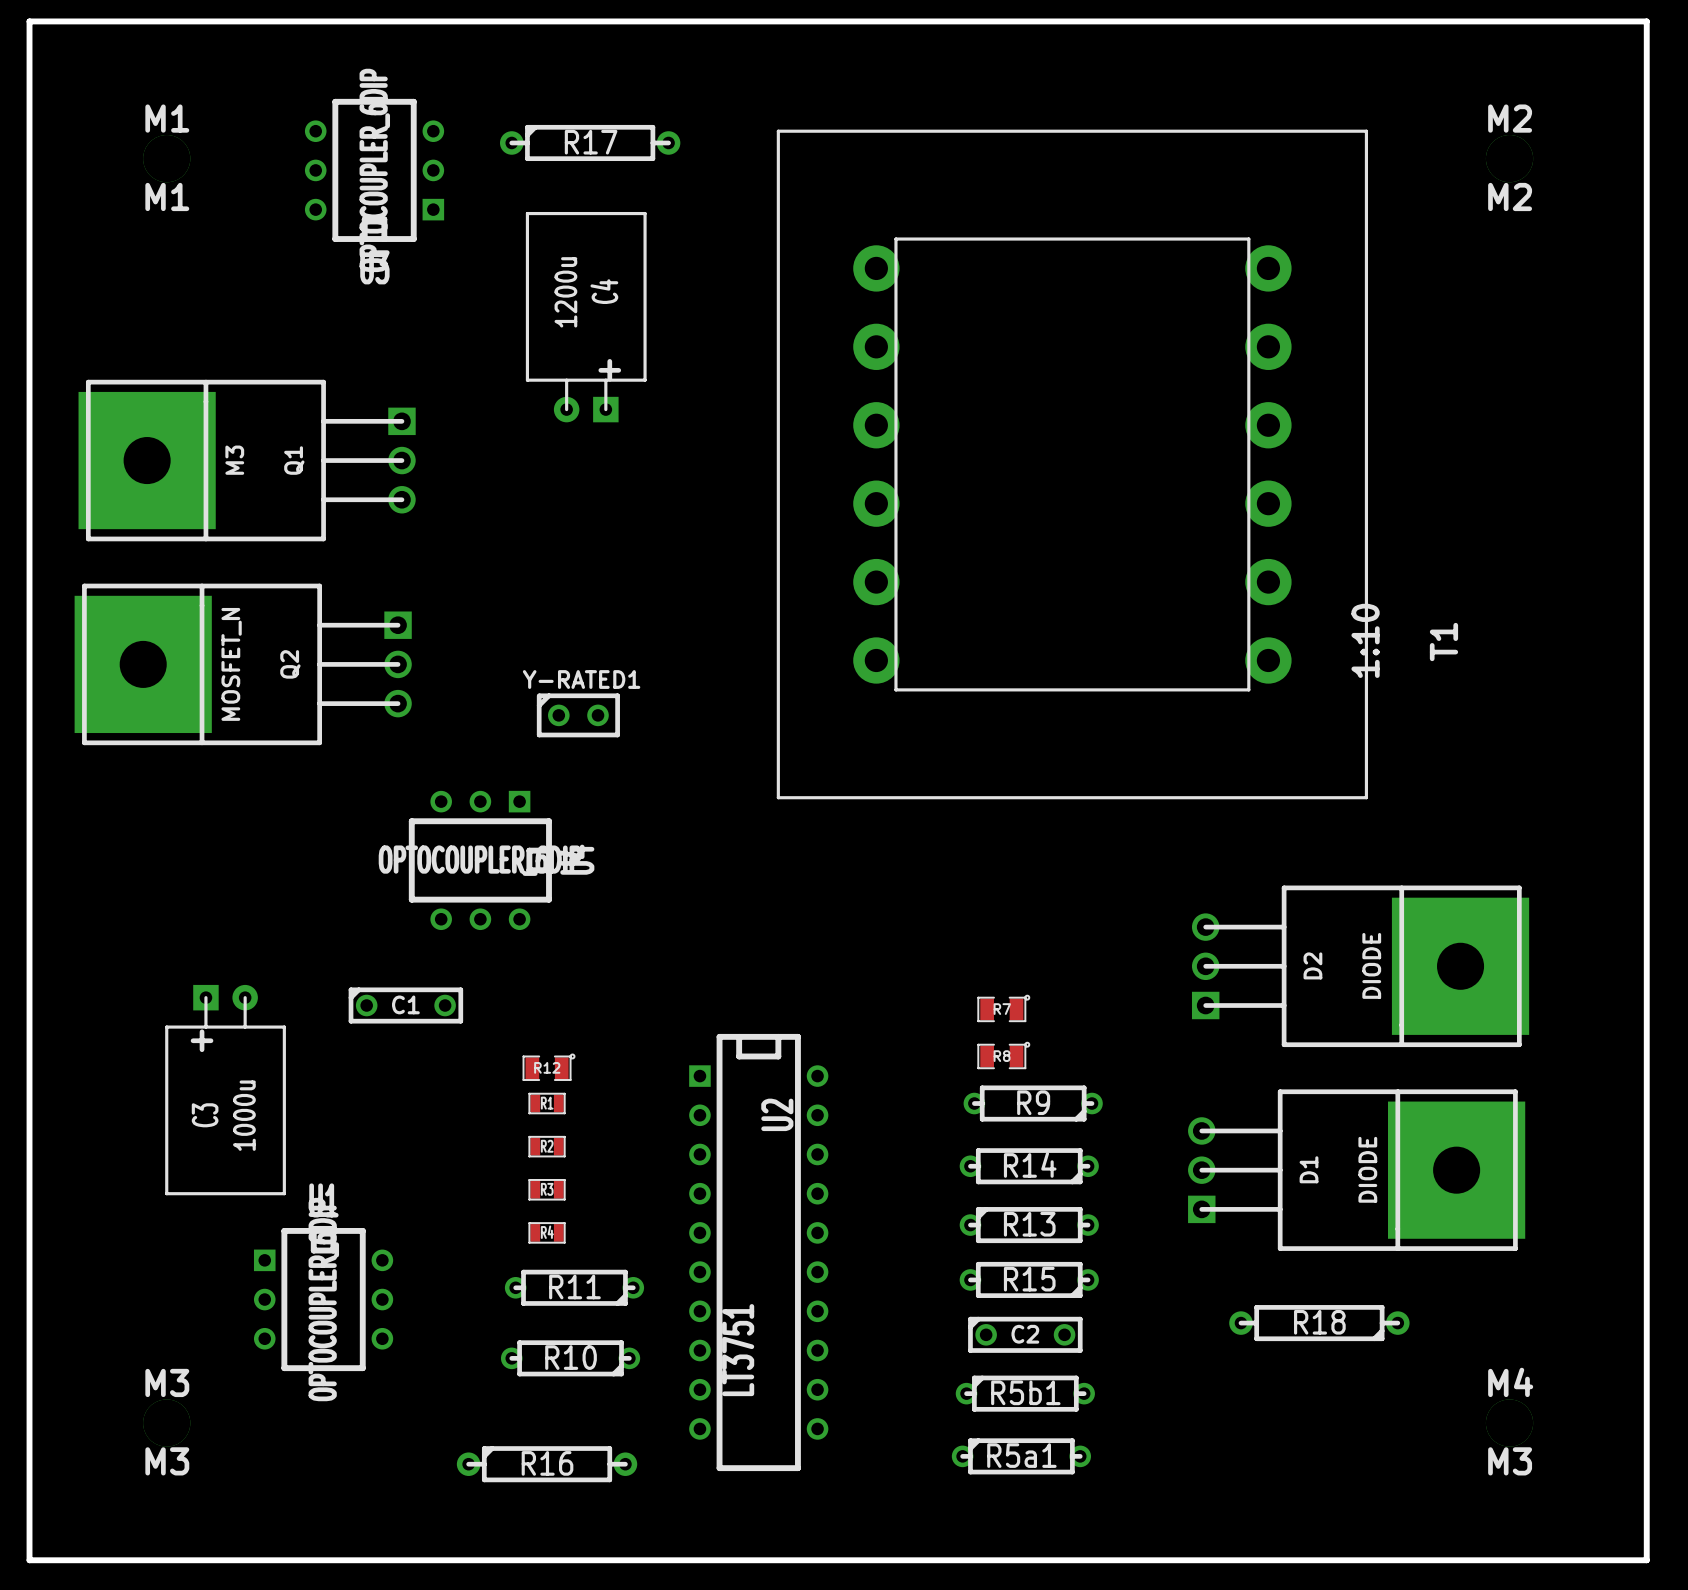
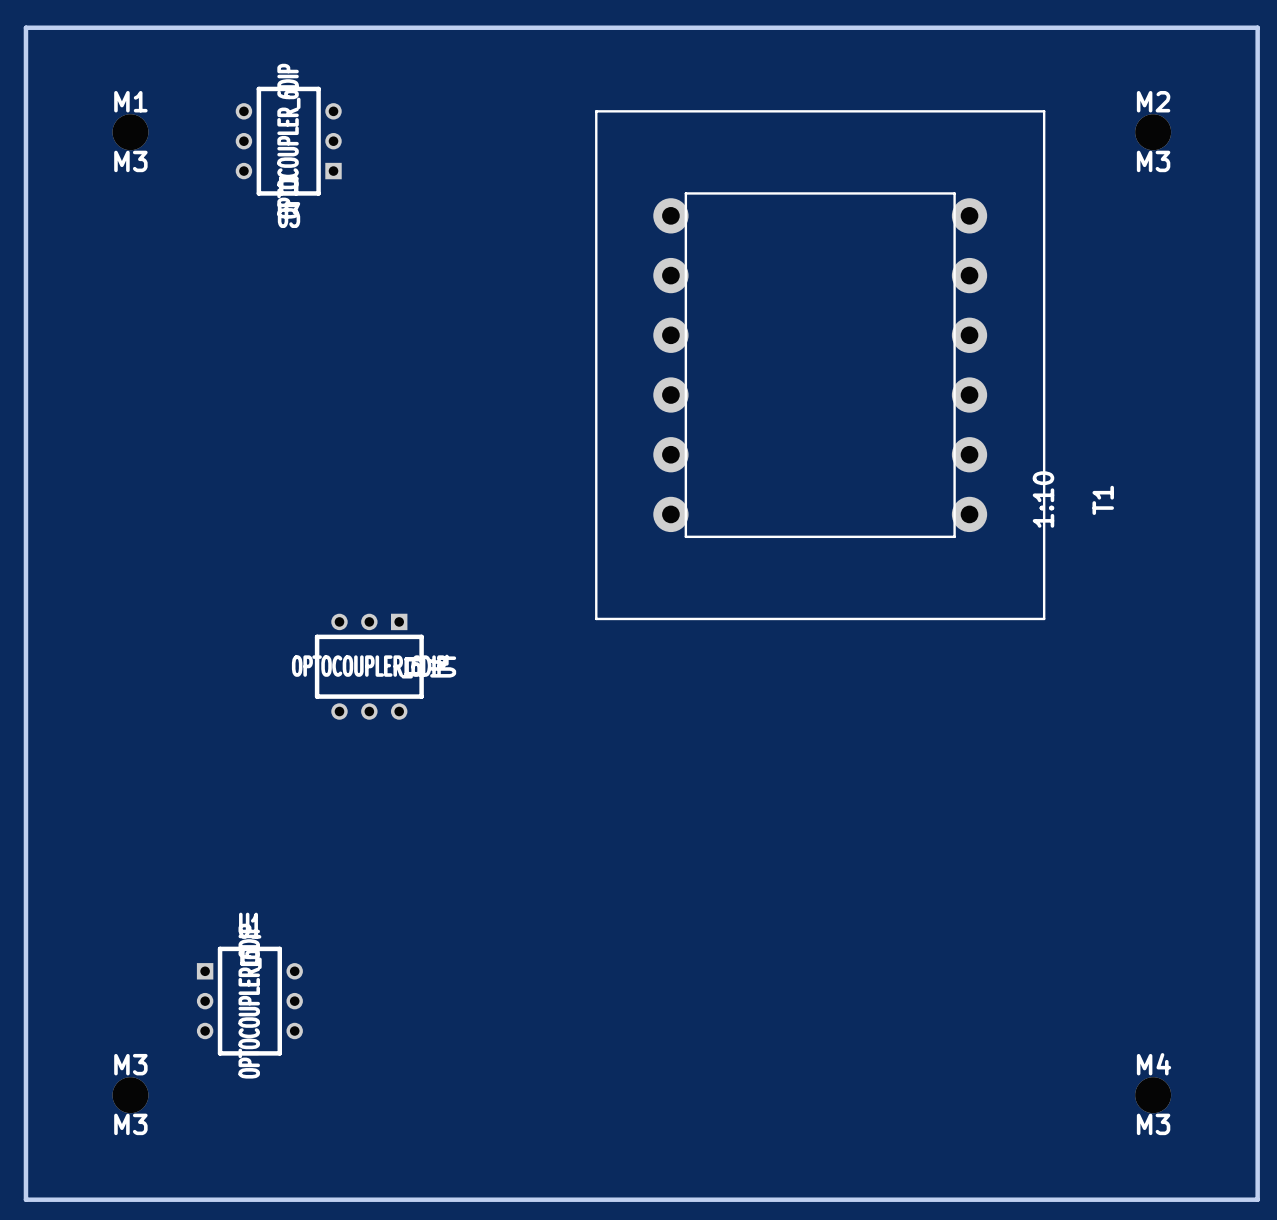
R17: (590, 142) -> none
M1 value: M1 (167, 196) -> M3 (130, 161)
M2 value: M2 (1510, 196) -> M3 (1153, 161)
C4: 1200u (586, 317) -> none
Q1: M3 (247, 460) -> none
Q2: MOSFET_N (243, 664) -> none
Y-RATED1: (578, 715) -> none
D2: DIODE (1360, 966) -> none
C1: (405, 1005) -> none
R7: (1003, 1008) -> none
R8: (1003, 1055) -> none
R12: (549, 1067) -> none
C3: 1000u (225, 1090) -> none
R1: (547, 1103) -> none
R9: (1033, 1103) -> none
R2: (547, 1146) -> none
R14: (1029, 1166) -> none
D1: DIODE (1356, 1170) -> none
R3: (547, 1189) -> none
R13: (1029, 1225) -> none
R4: (547, 1232) -> none
U2: LT3751 (758, 1252) -> none
R15: (1029, 1279) -> none
R11: (574, 1287) -> none
R18: (1319, 1323) -> none
C2: (1025, 1334) -> none
R10: (570, 1358) -> none
R5b1: (1025, 1393) -> none
R5a1: (1021, 1456) -> none
R16: (547, 1464) -> none

